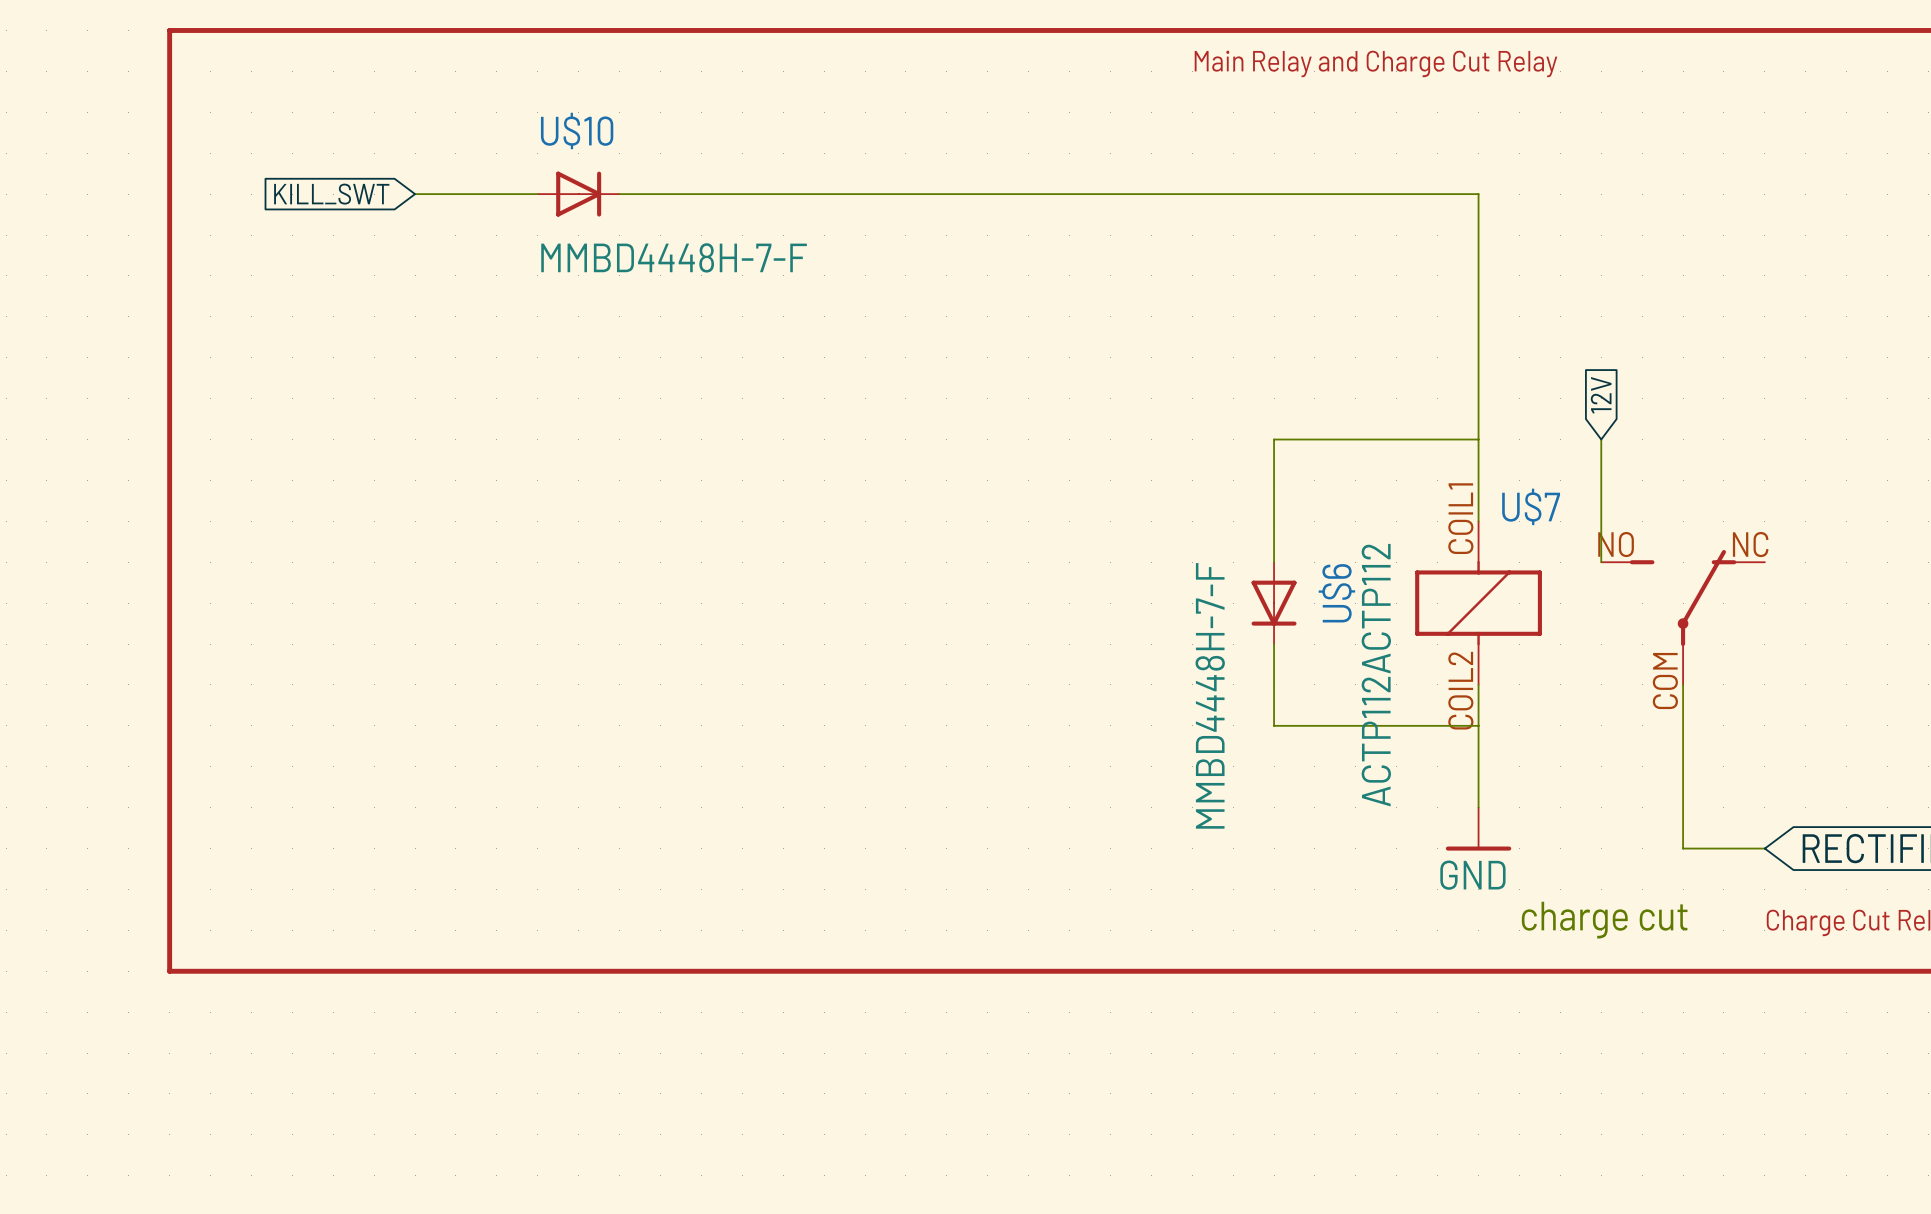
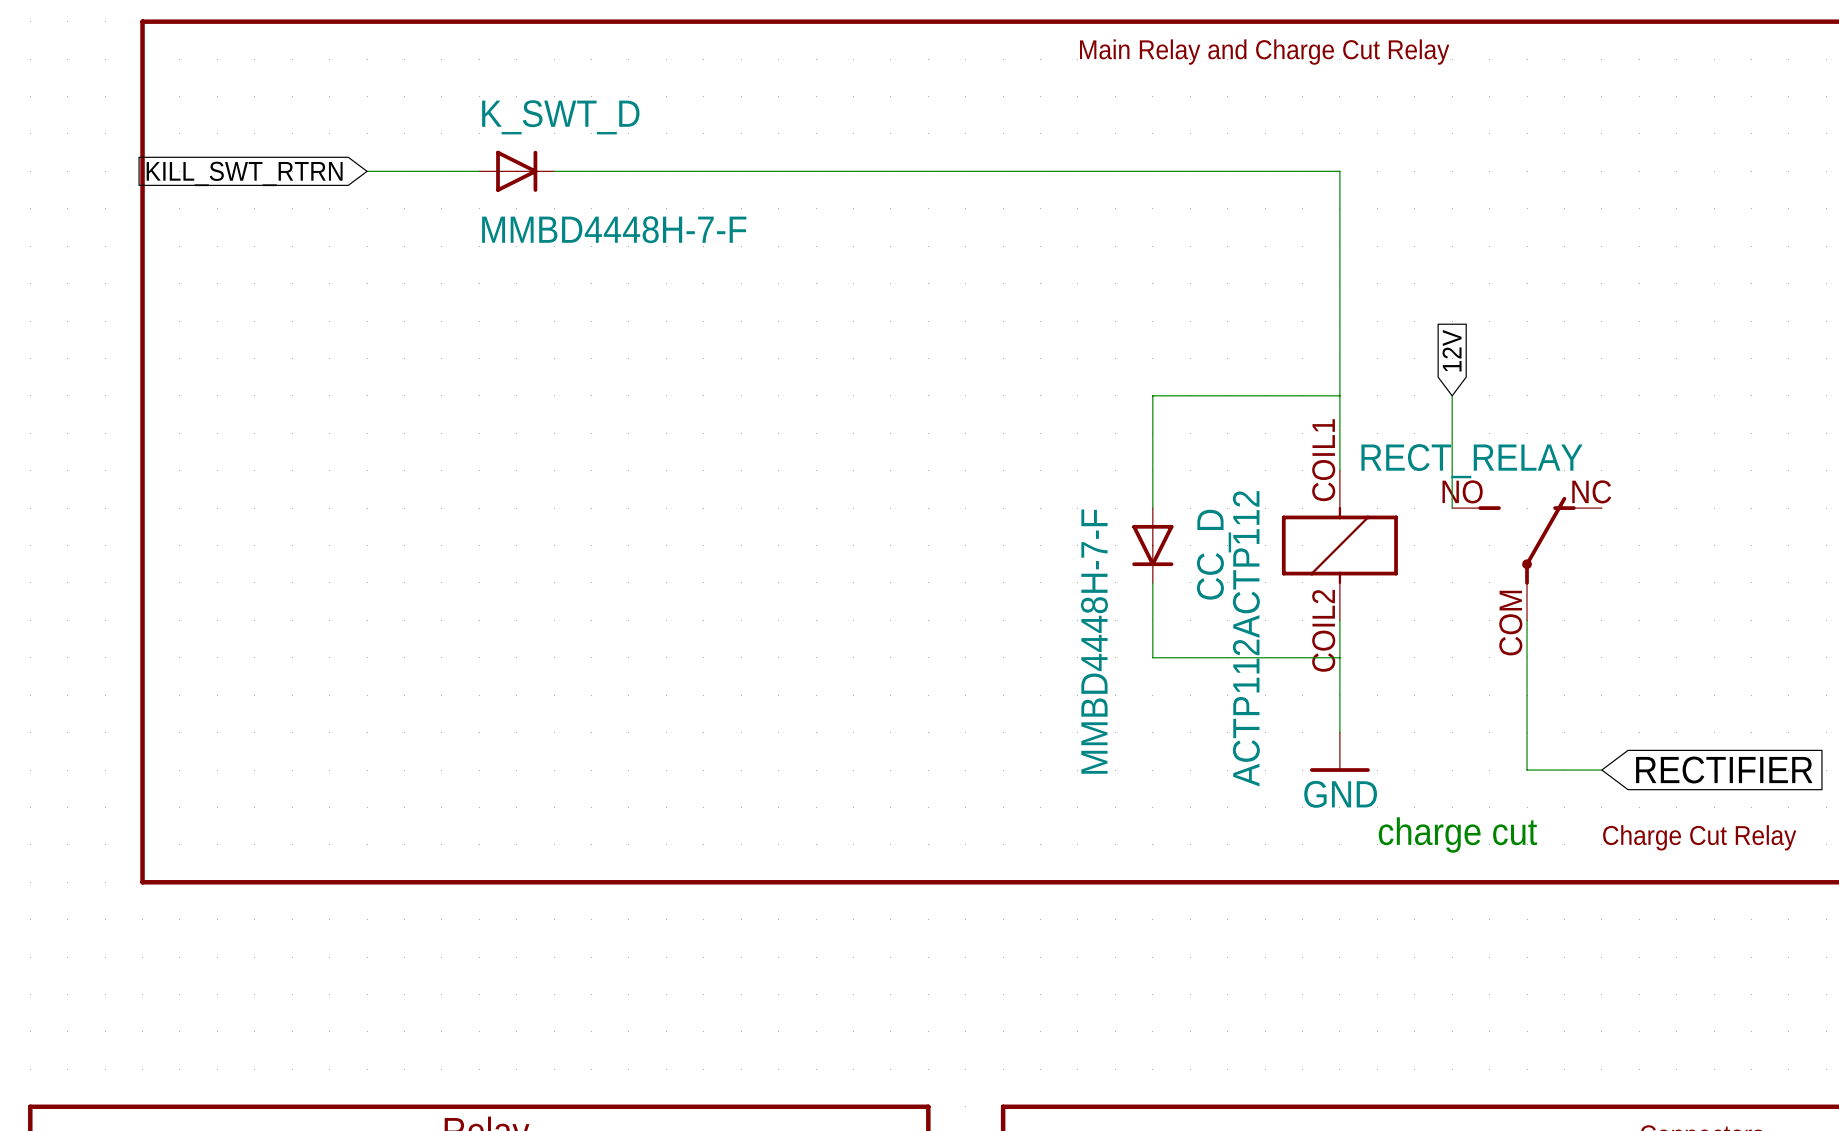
U$10 name: U$10 (577, 130) -> K_SWT_D (560, 117)
global label: KILL_SWT (331, 194) -> KILL_SWT_RTRN (244, 173)
U$7 name: U$7 (1531, 506) -> RECT_RELAY (1472, 461)
U$6 name: U$6 (1336, 593) -> CC_D (1214, 554)

